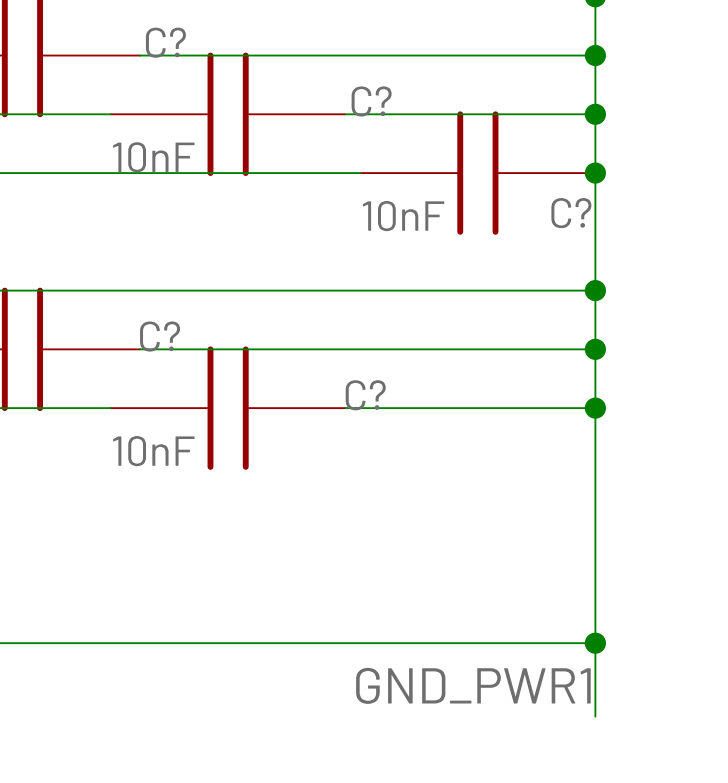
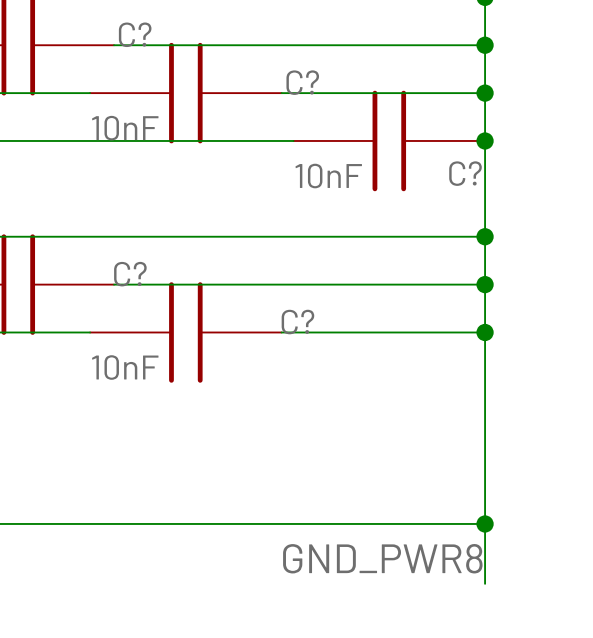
label: GND_PWR1 (473, 685) -> GND_PWR8 (382, 558)

